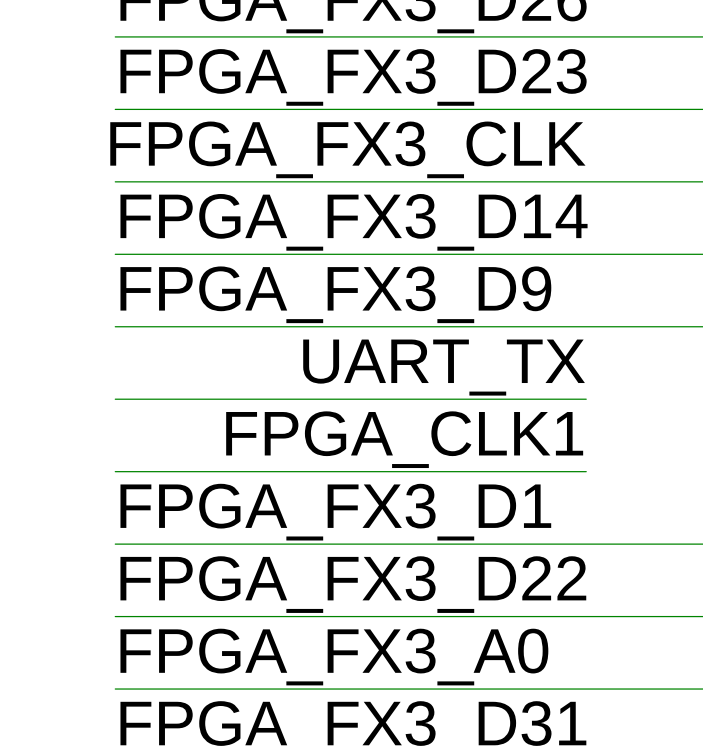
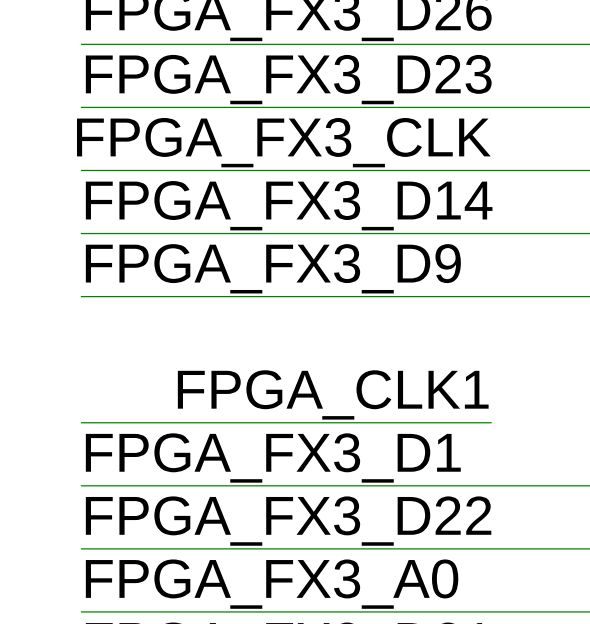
label: UART_TX (444, 367) -> none
wire: (115, 399) (586, 399) -> none

